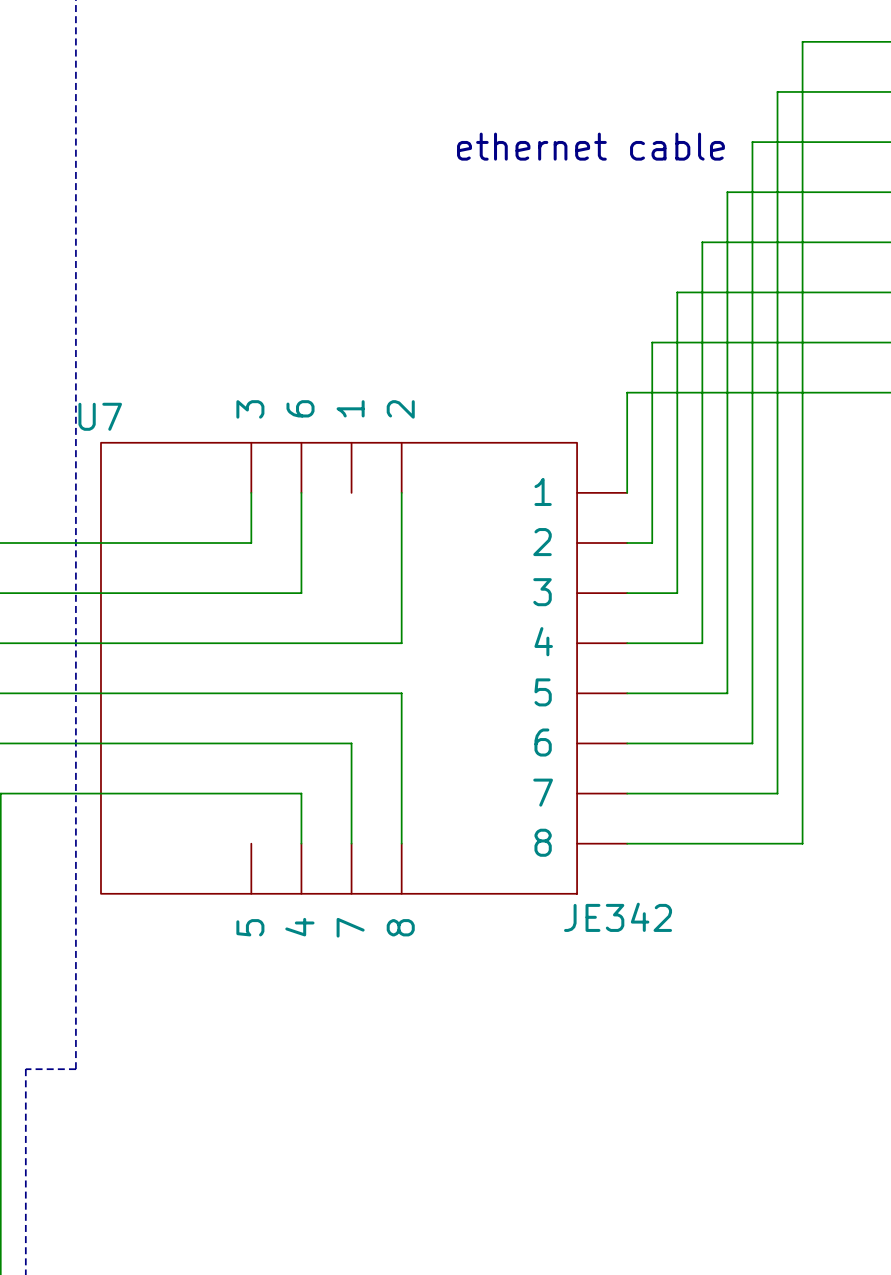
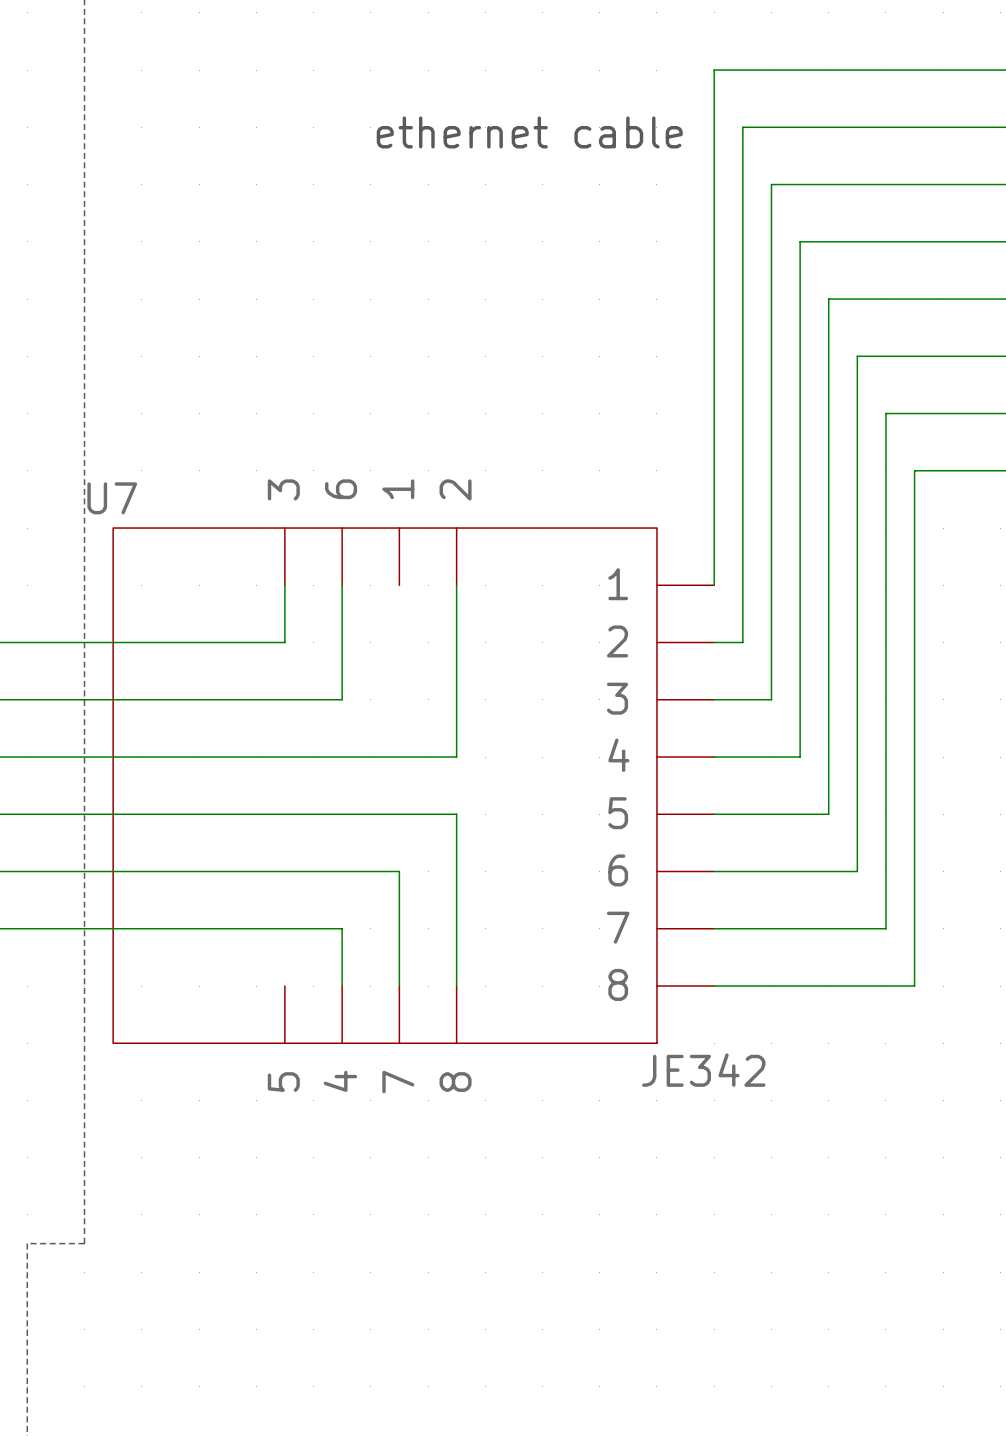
wire: (802, 41) (802, 392) (627, 392) -> (914, 70) (714, 70) (714, 470)
wire: (777, 91) (777, 342) (652, 342) -> (885, 127) (742, 127) (742, 413)
wire: (752, 142) (752, 292) (677, 292) -> (857, 184) (771, 184) (771, 356)
text position: ethernet cable (590, 146) -> ethernet cable (529, 132)
wire: (727, 192) (727, 242) (702, 242) -> (828, 241) (800, 241) (800, 299)

